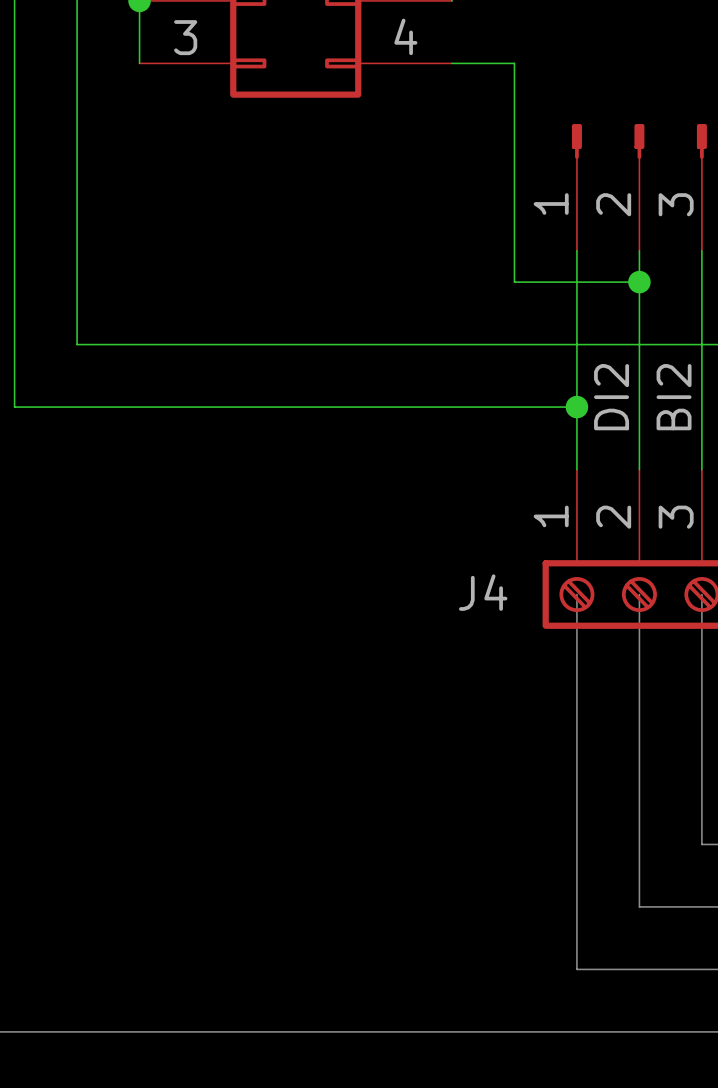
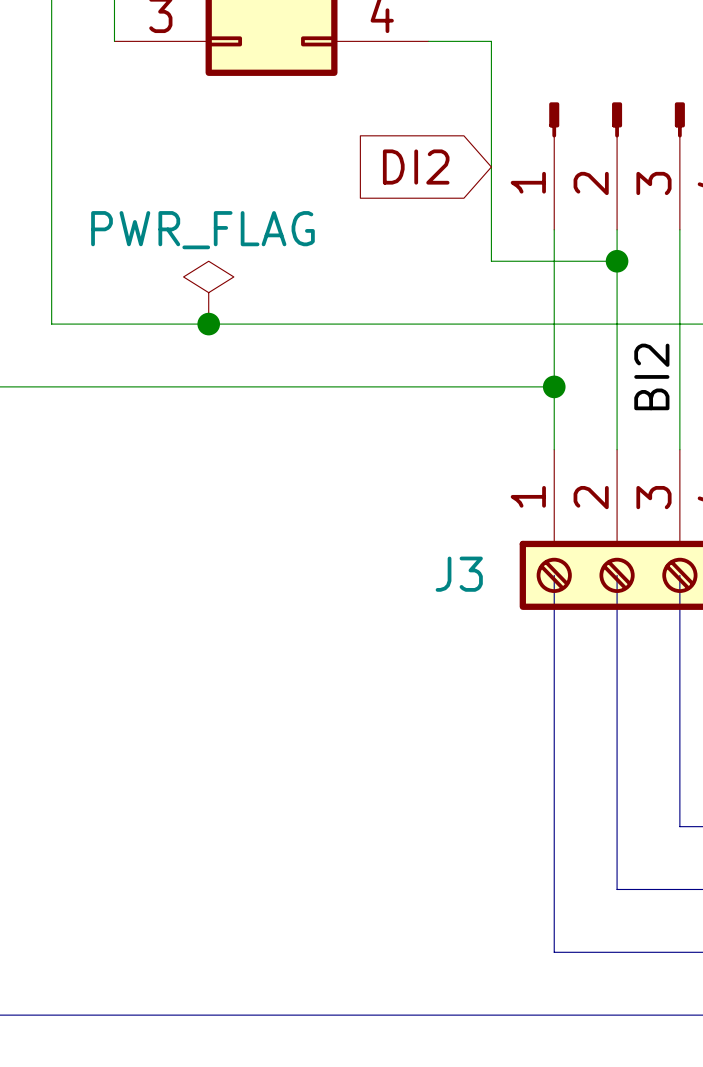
global label: none -> DI2 (416, 167)
power symbol: none -> PWR_FLAG (208, 292)
junction: none -> (208, 324)
label: DI2 (611, 397) -> none
J4 name: J4 (483, 592) -> J3 (459, 574)

